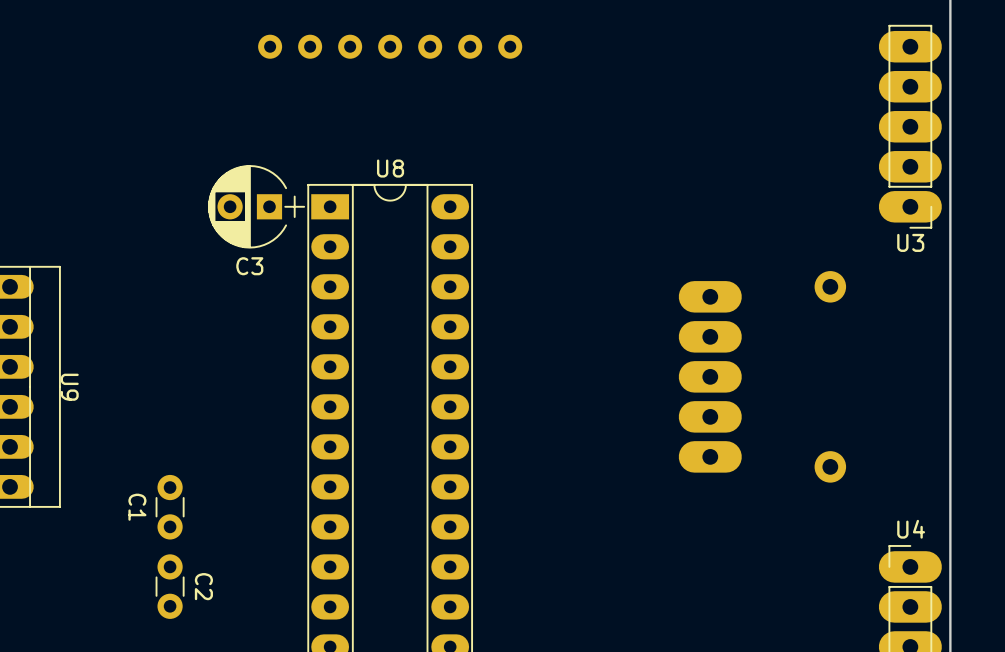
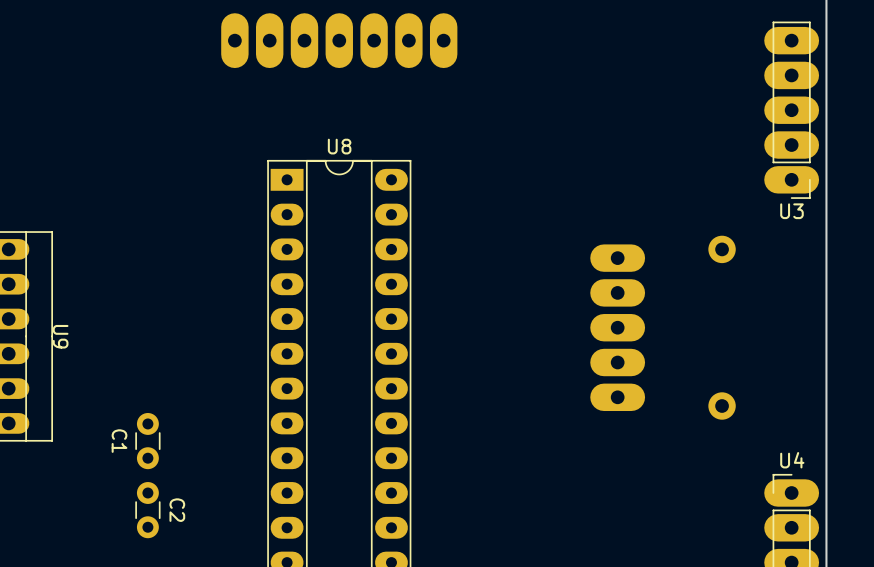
part footprint: [258, 34, 523, 59] -> [221, 13, 458, 69]
C3: (256, 206) -> none

